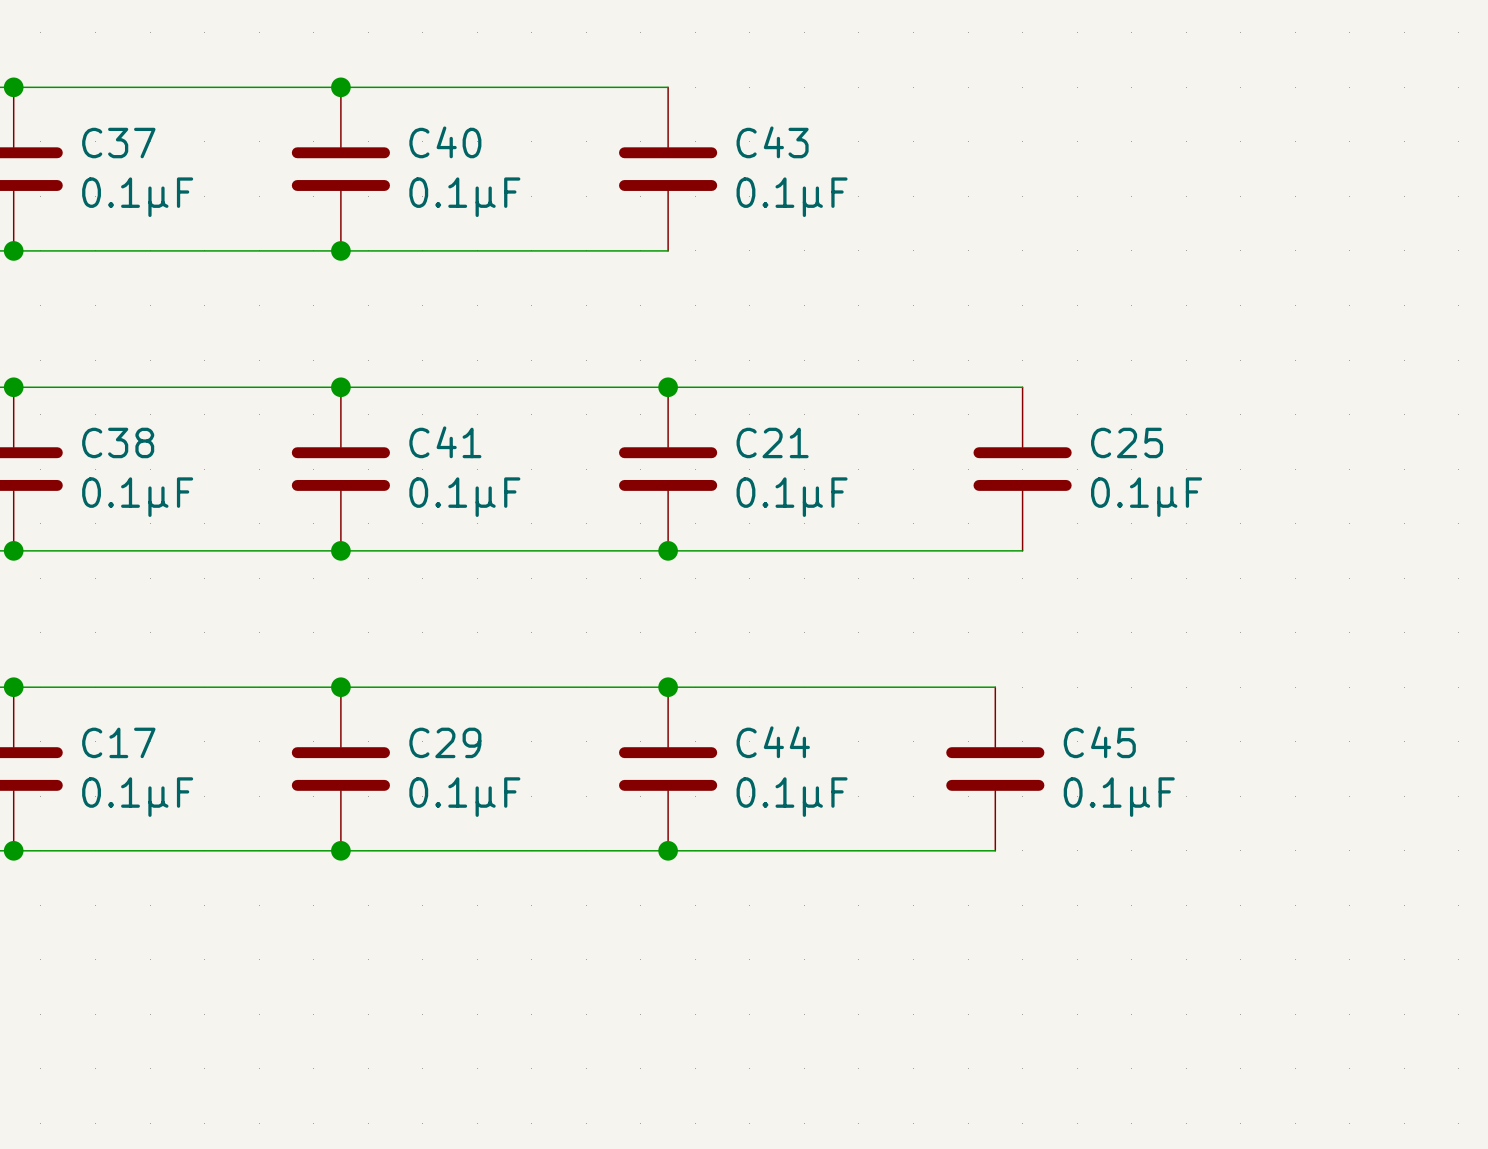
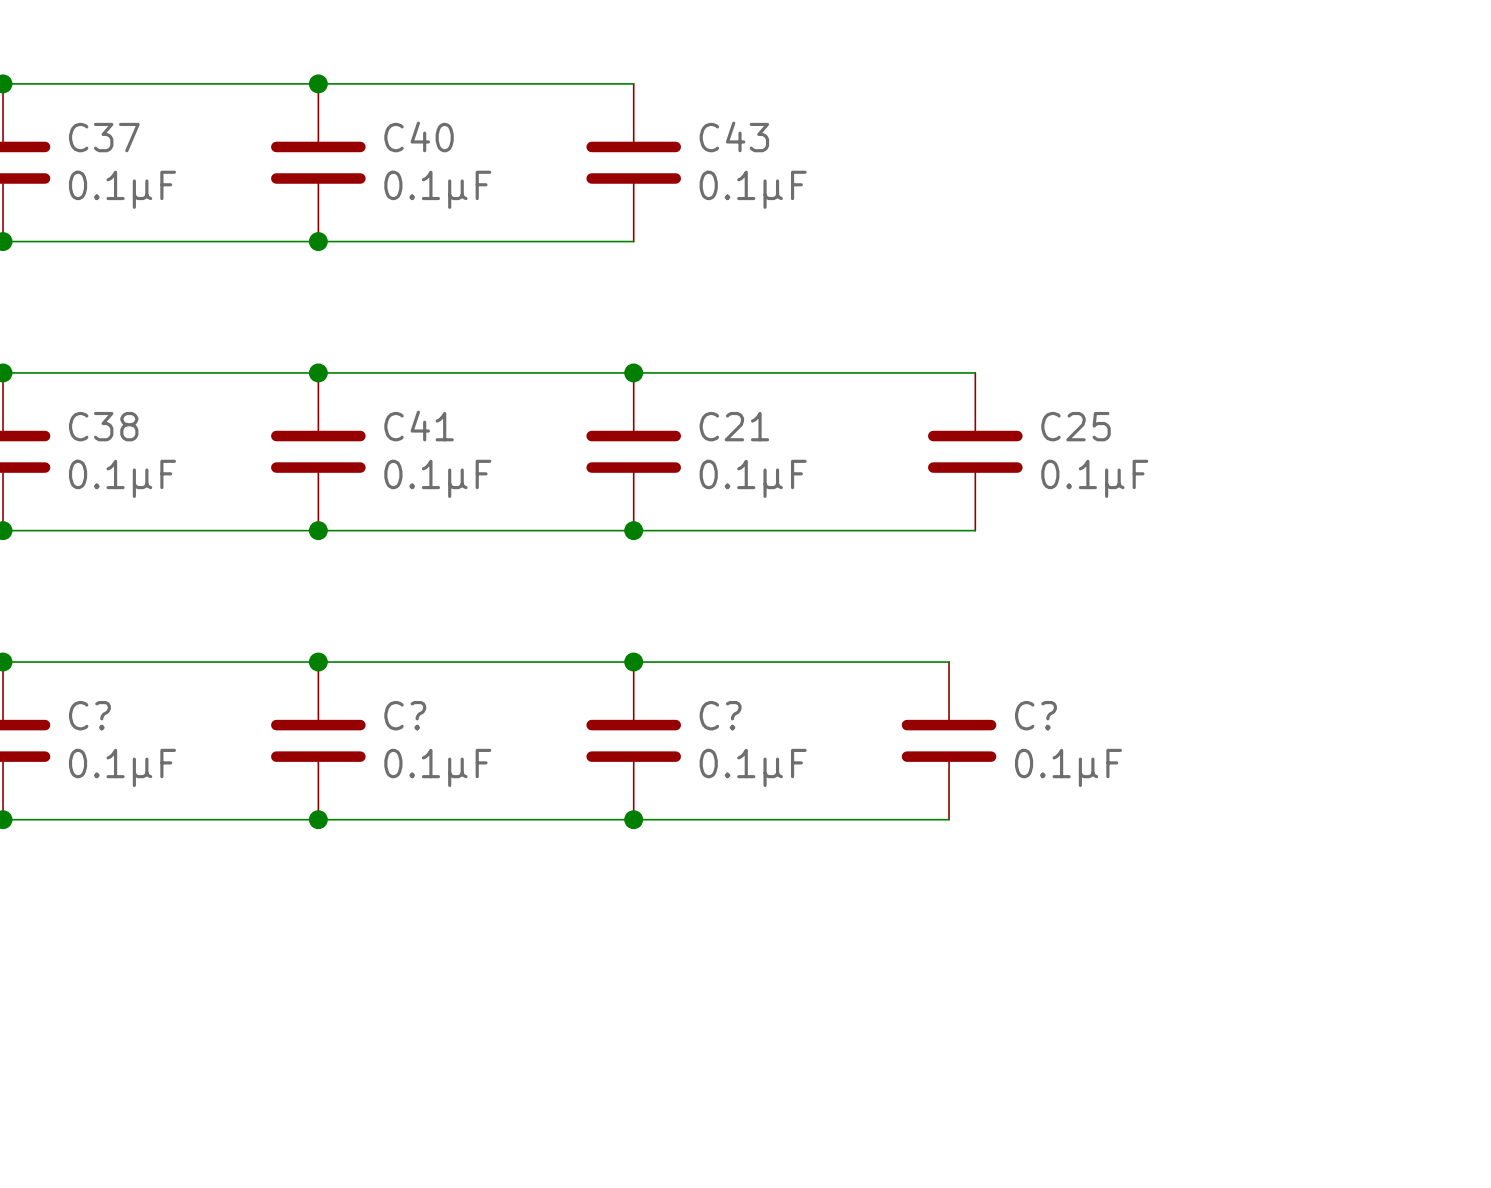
C17 name: C17 (118, 742) -> C? (89, 715)
C29 name: C29 (445, 742) -> C? (405, 715)
C44 name: C44 (773, 742) -> C? (720, 715)
C45 name: C45 (1099, 742) -> C? (1035, 715)

